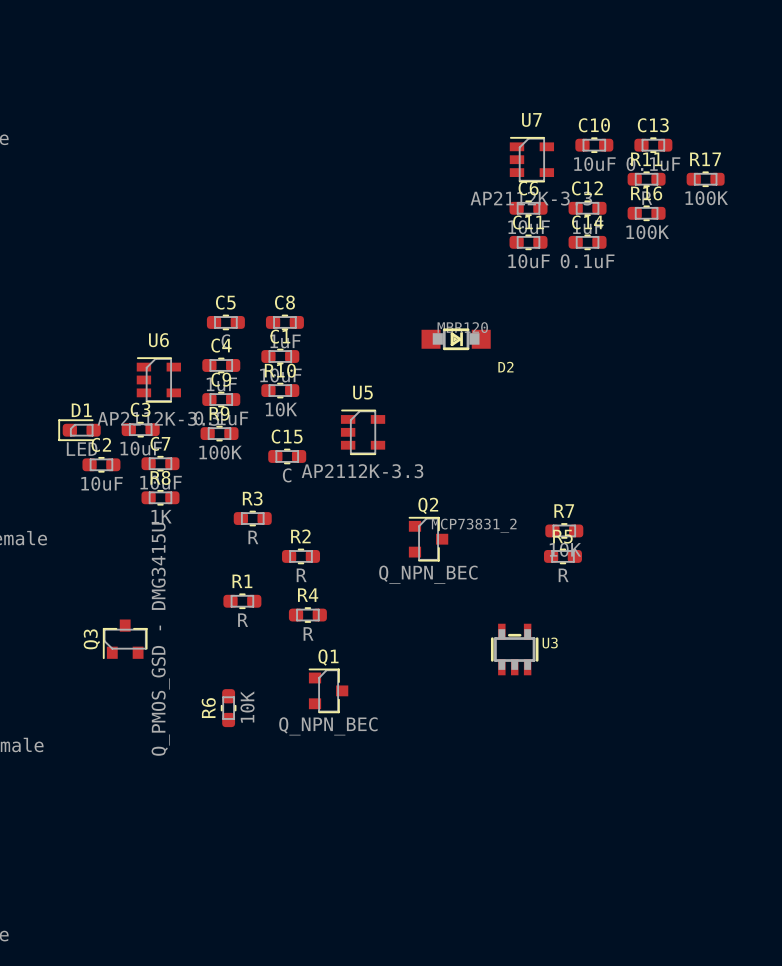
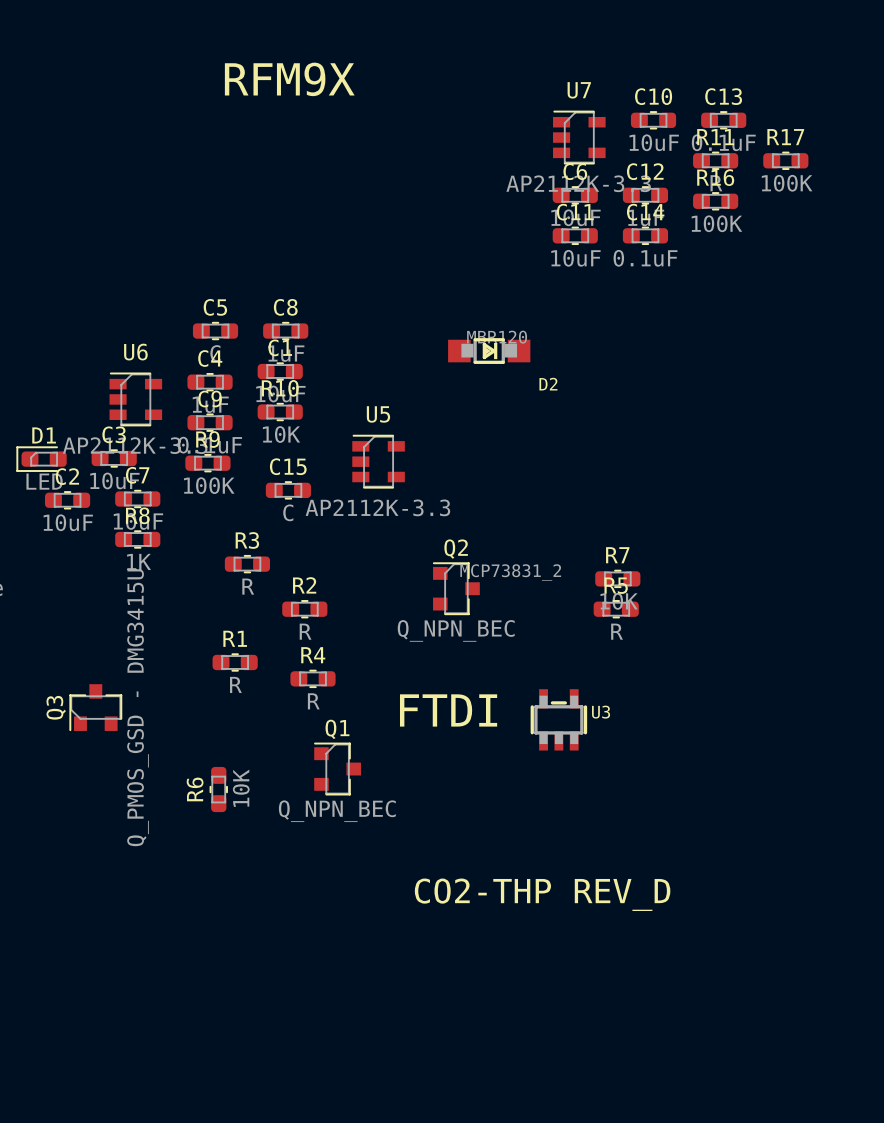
text: none -> RFM9X (289, 79)
text: none -> FTDI (448, 710)
text: none -> CO2-THP REV_D (542, 894)

